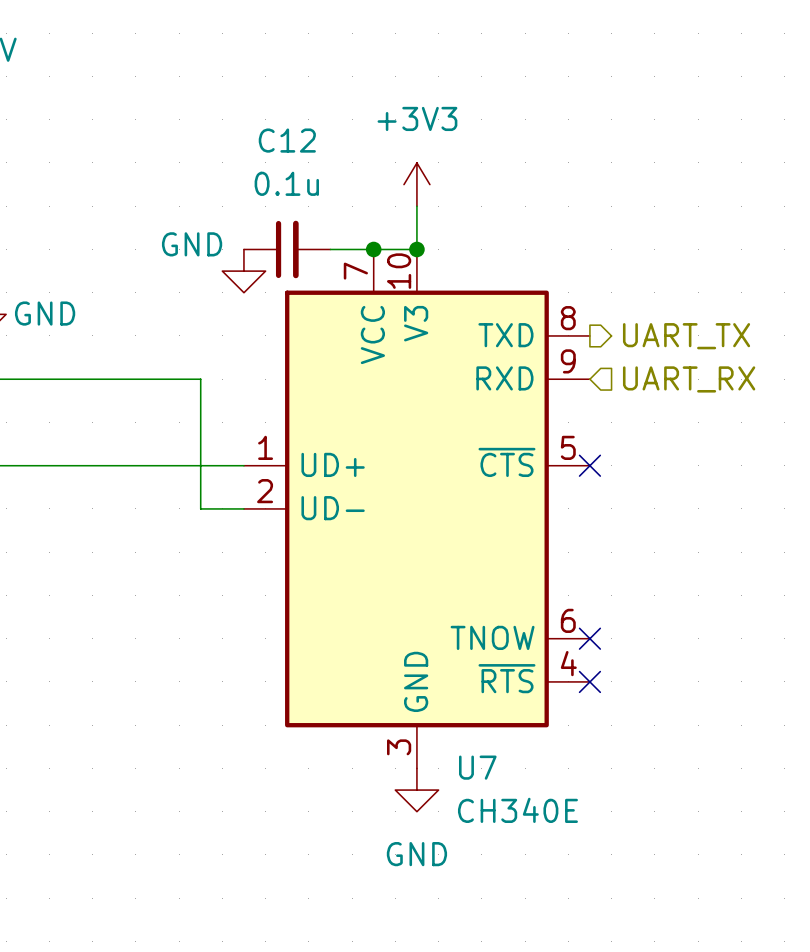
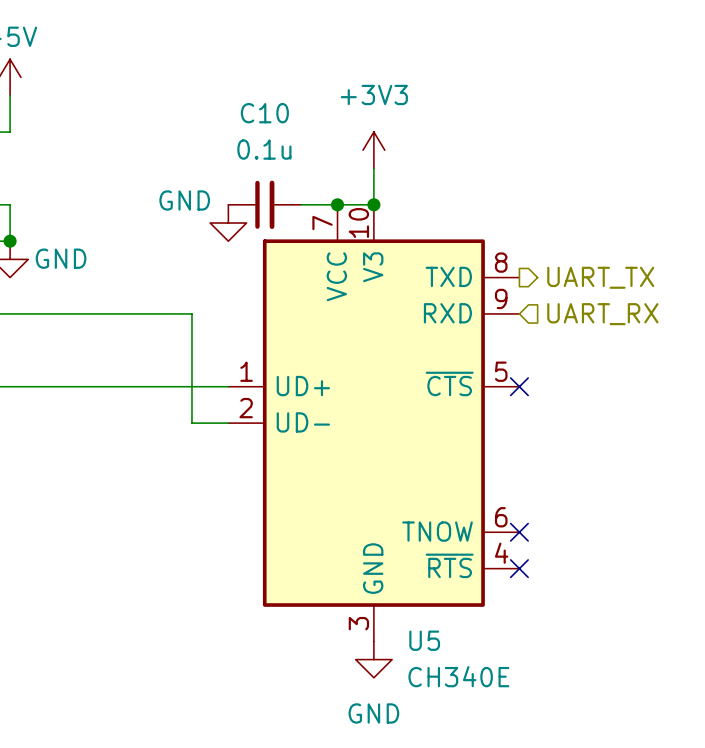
C12 name: C12 (287, 140) -> C10 (264, 113)
U7 name: U7 (477, 767) -> U5 (424, 640)

